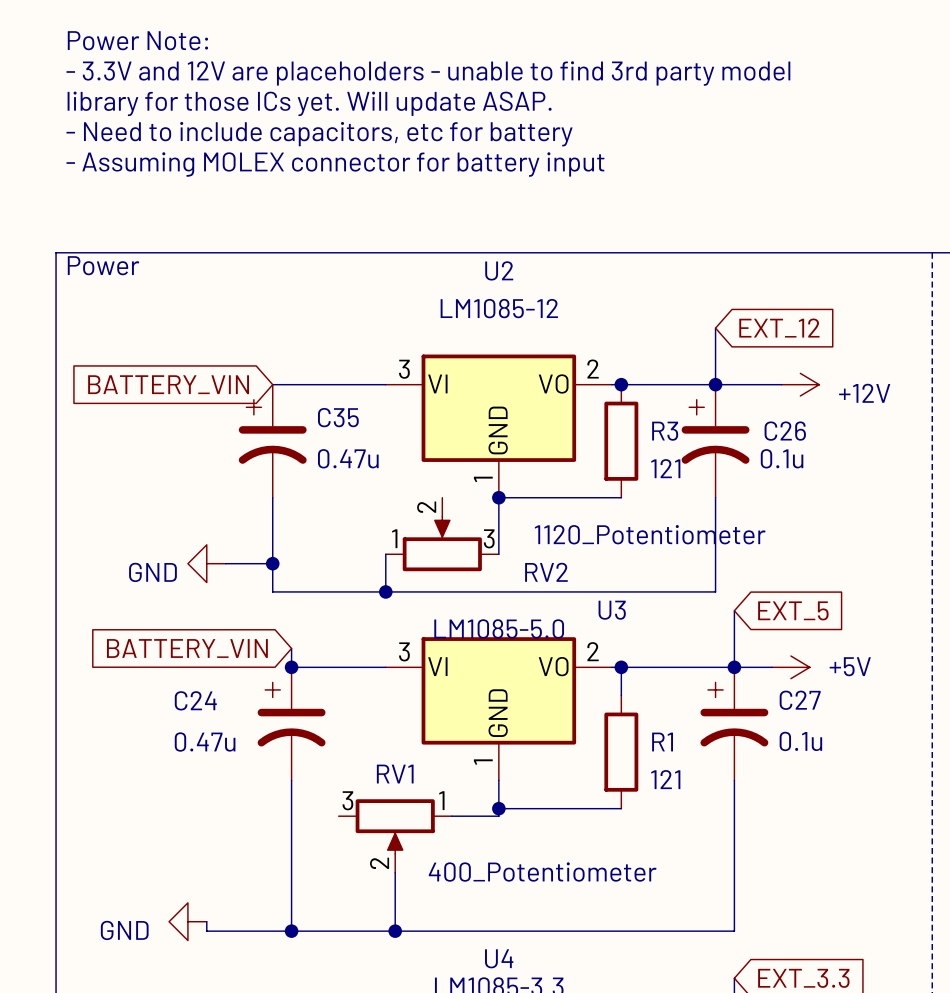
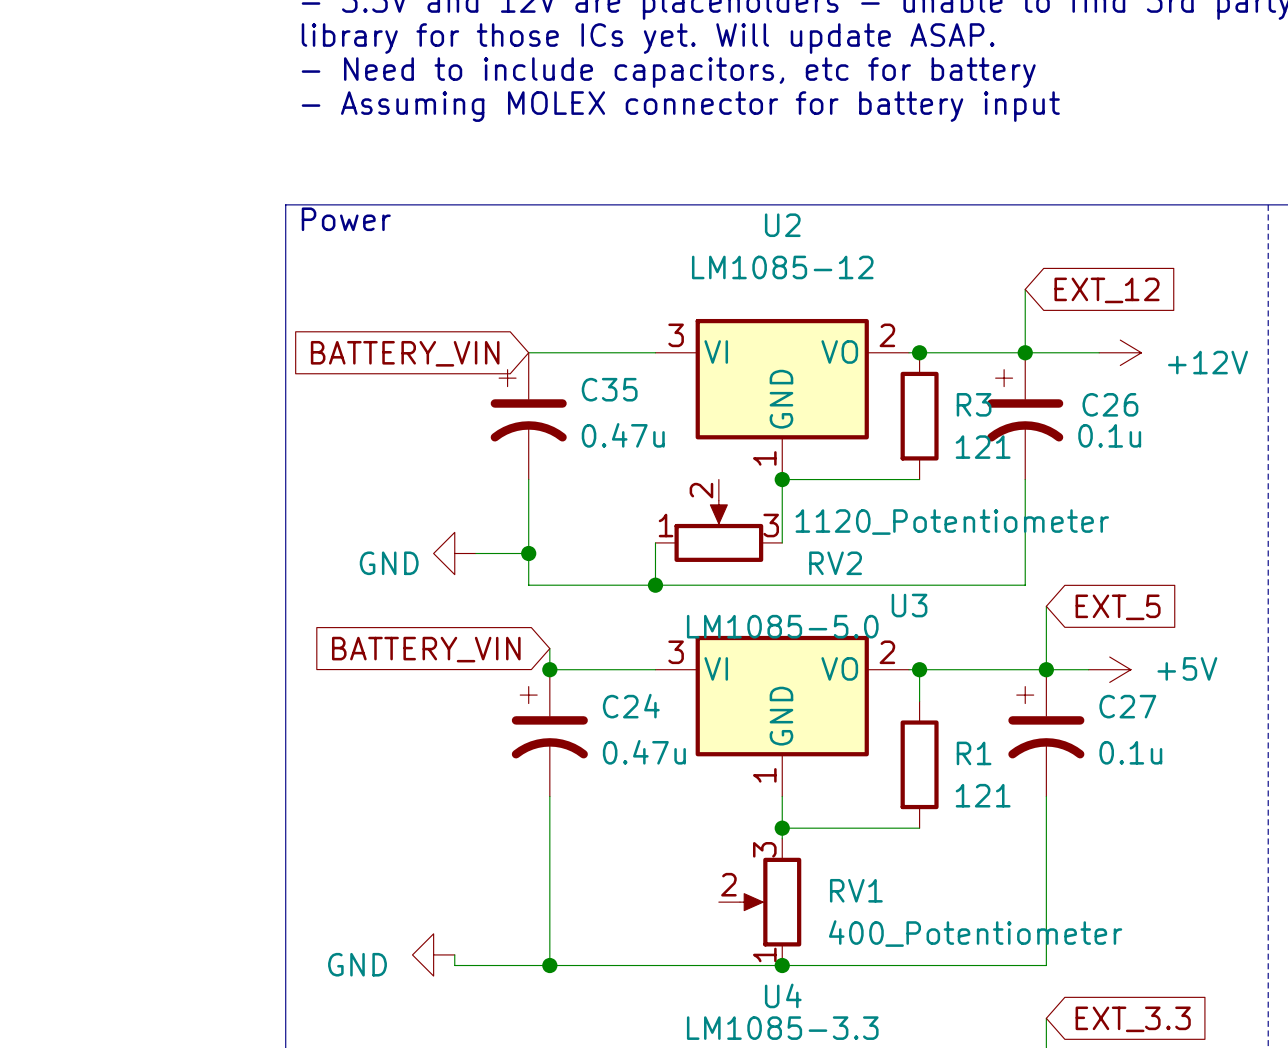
C24 name position: C24 (195, 700) -> C24 (631, 706)
C24 value position: 0.47u (205, 742) -> 0.47u (644, 752)
RV1 name position: RV1 (395, 774) -> RV1 (856, 890)
wire: (451, 816) (498, 816) -> (782, 838) (782, 836)
RV1 rotation: 0° (395, 826) -> 90° clockwise (770, 902)
RV1 position: (395, 835) -> (760, 902)
wire: (395, 872) (395, 931) -> none
RV1 value position: 400_Potentiometer (542, 872) -> 400_Potentiometer (975, 933)
junction: (395, 931) -> none
junction: none -> (782, 965)

